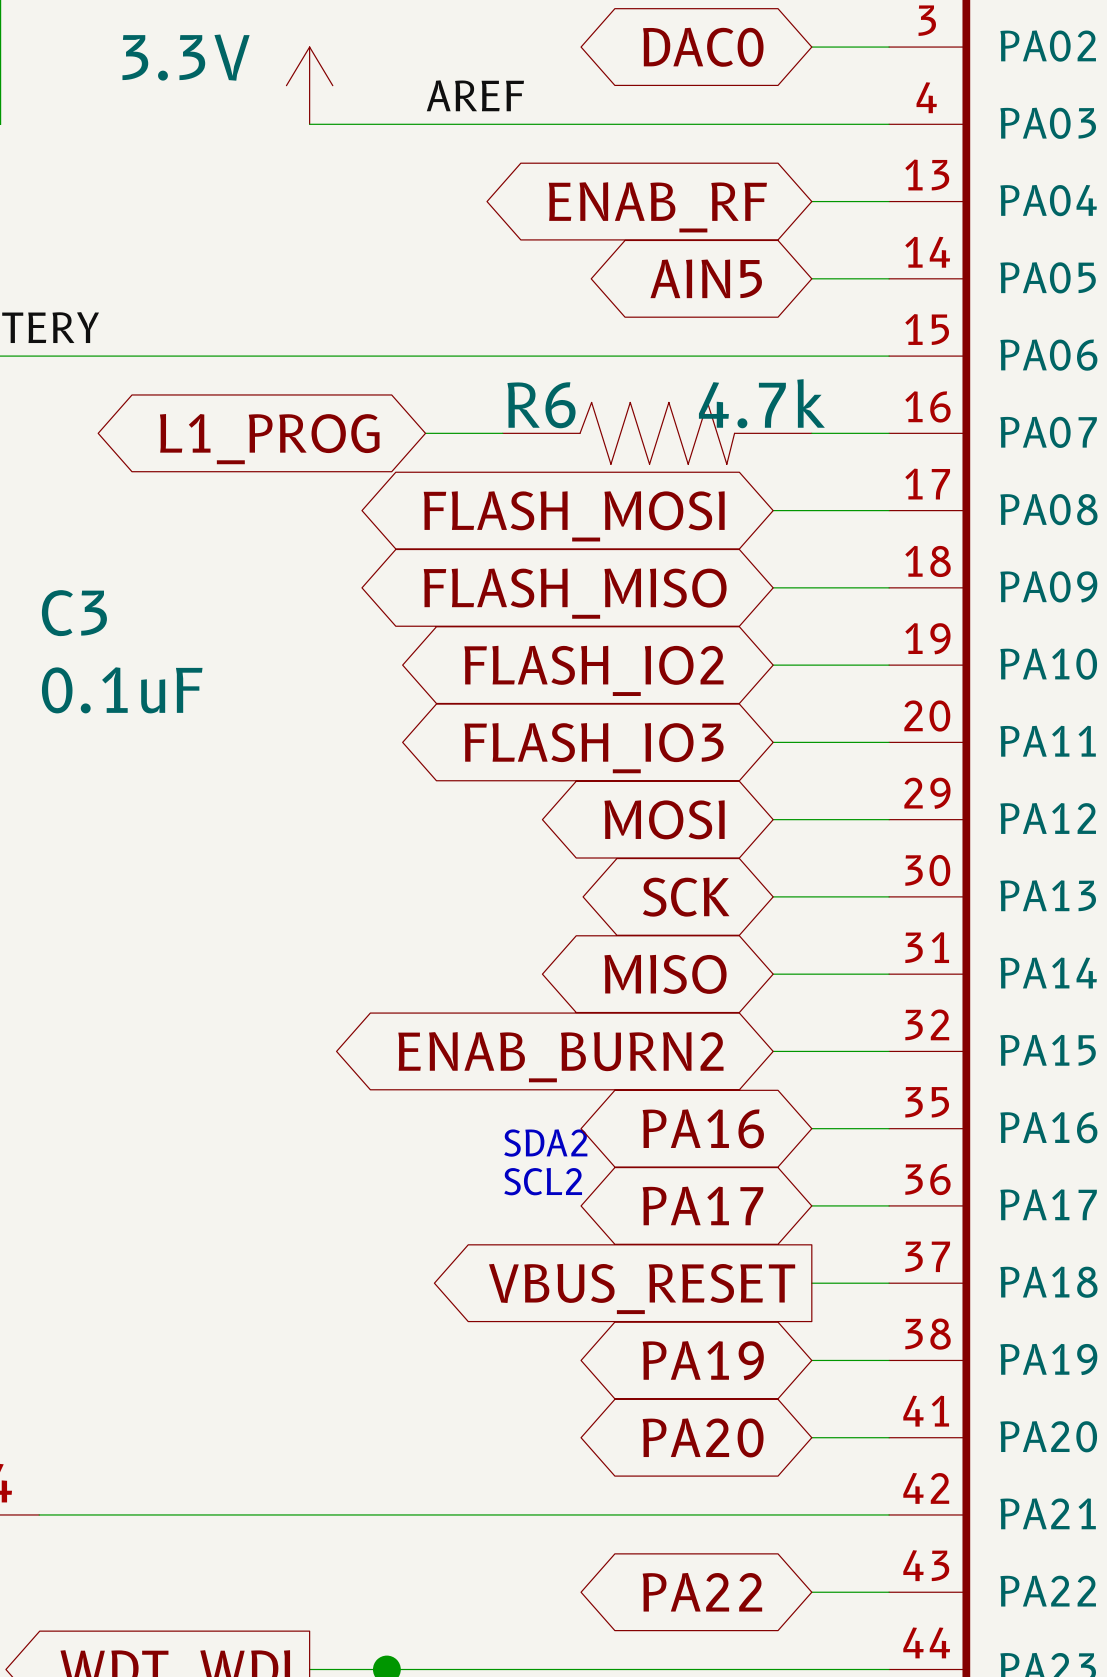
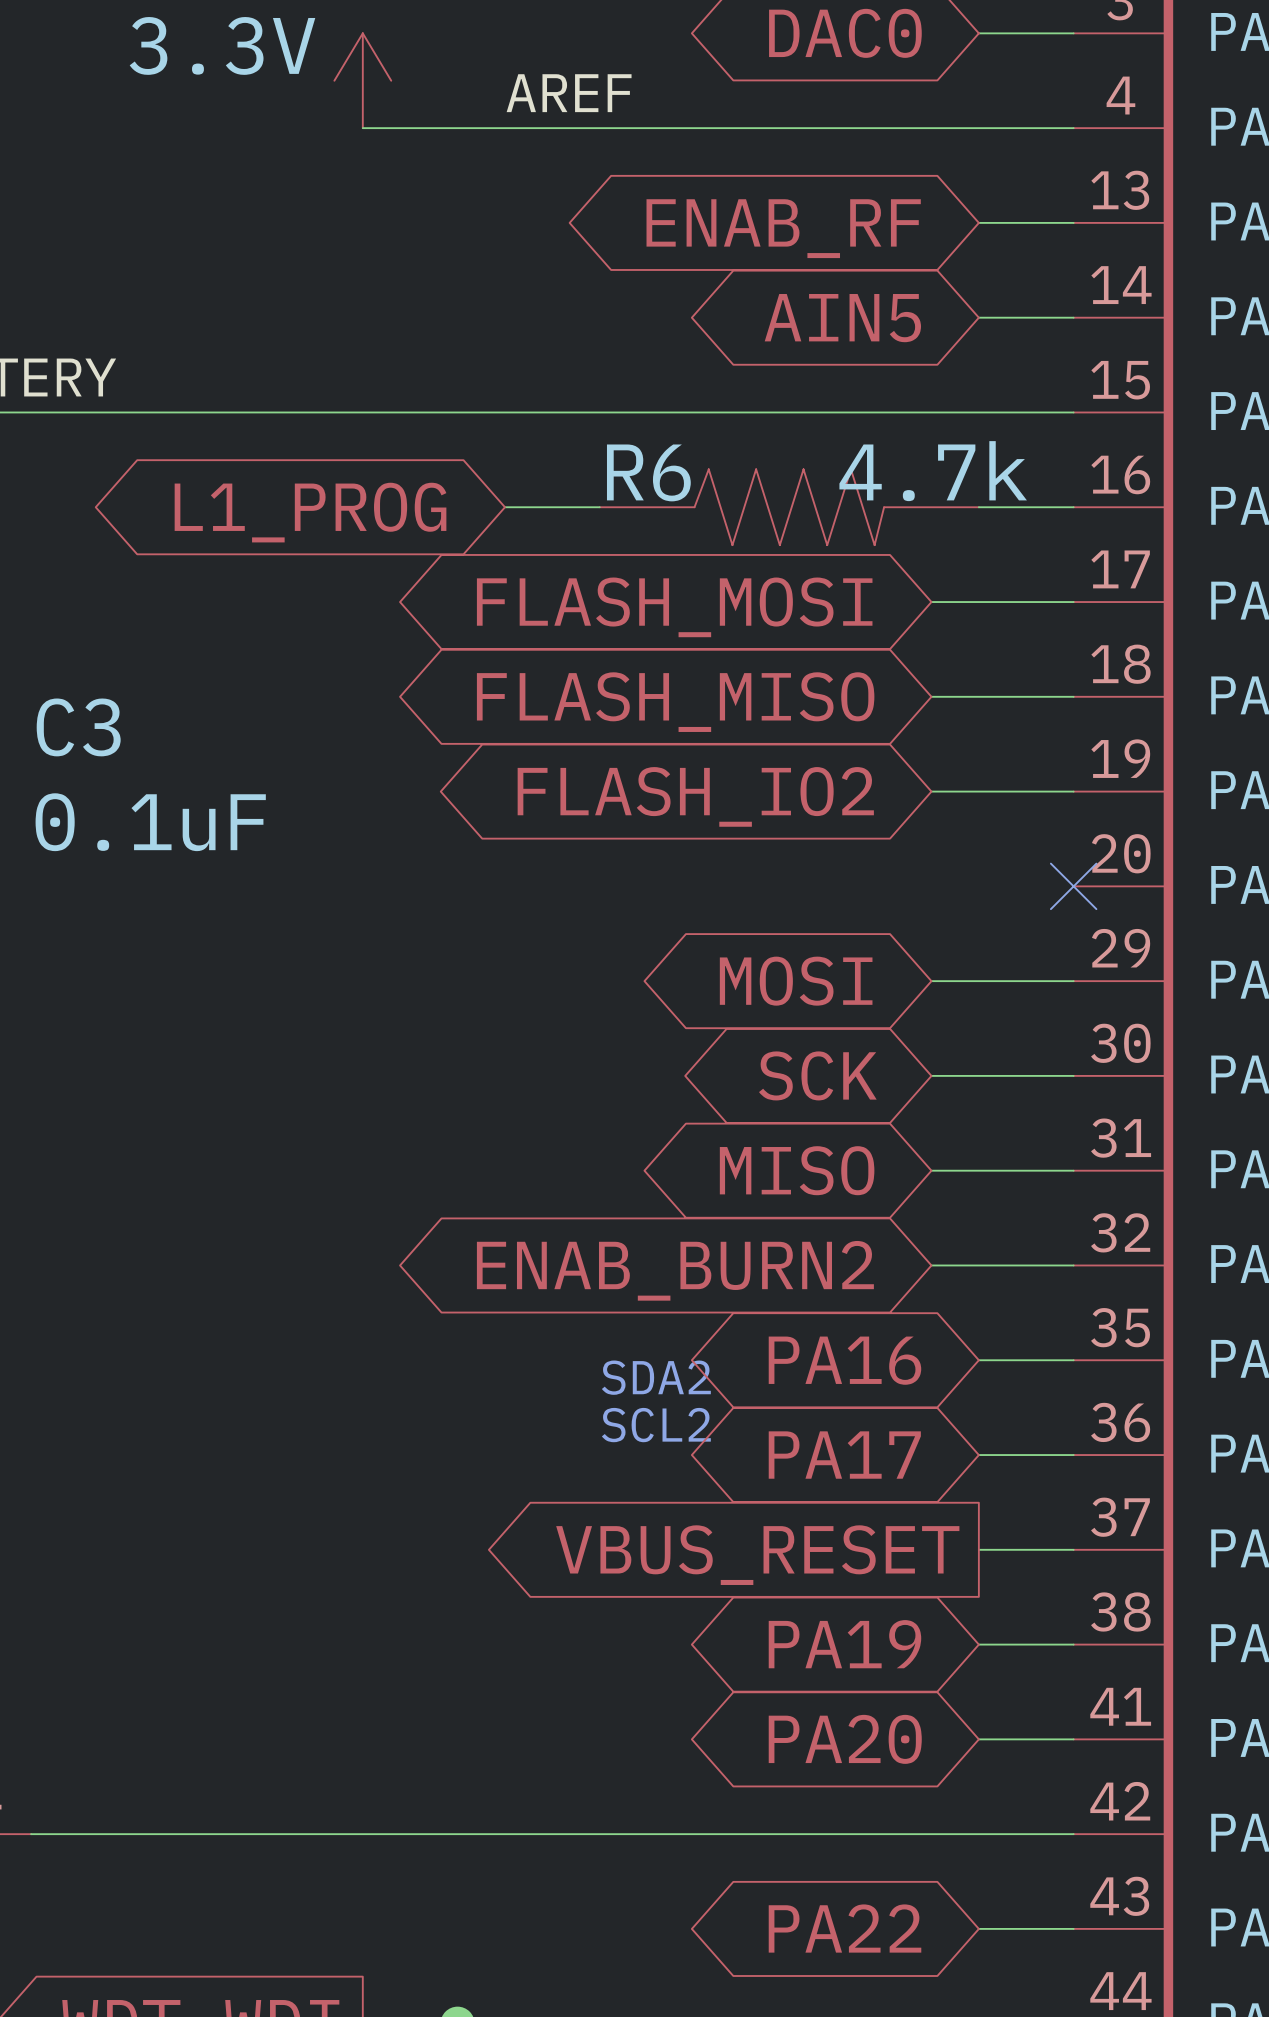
wire: (773, 742) (889, 742) -> none
no-connect mark: none -> (1073, 886)
global label: FLASH_IO3 (593, 748) -> none

